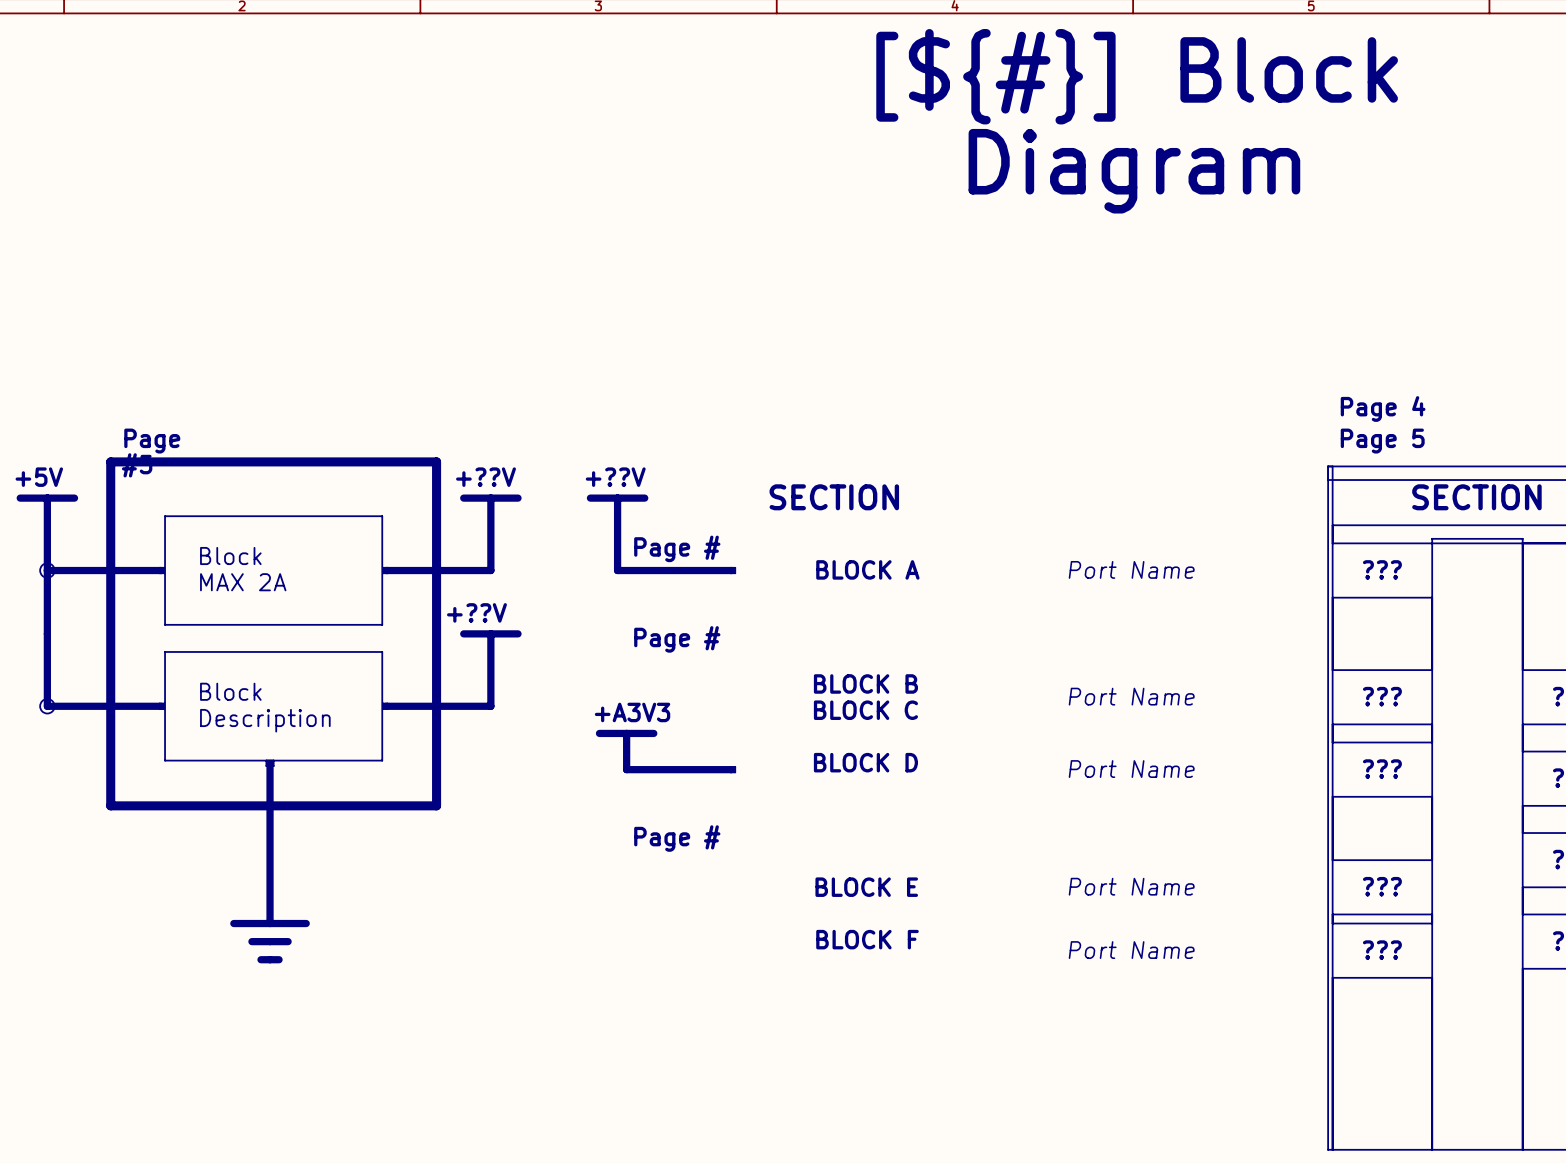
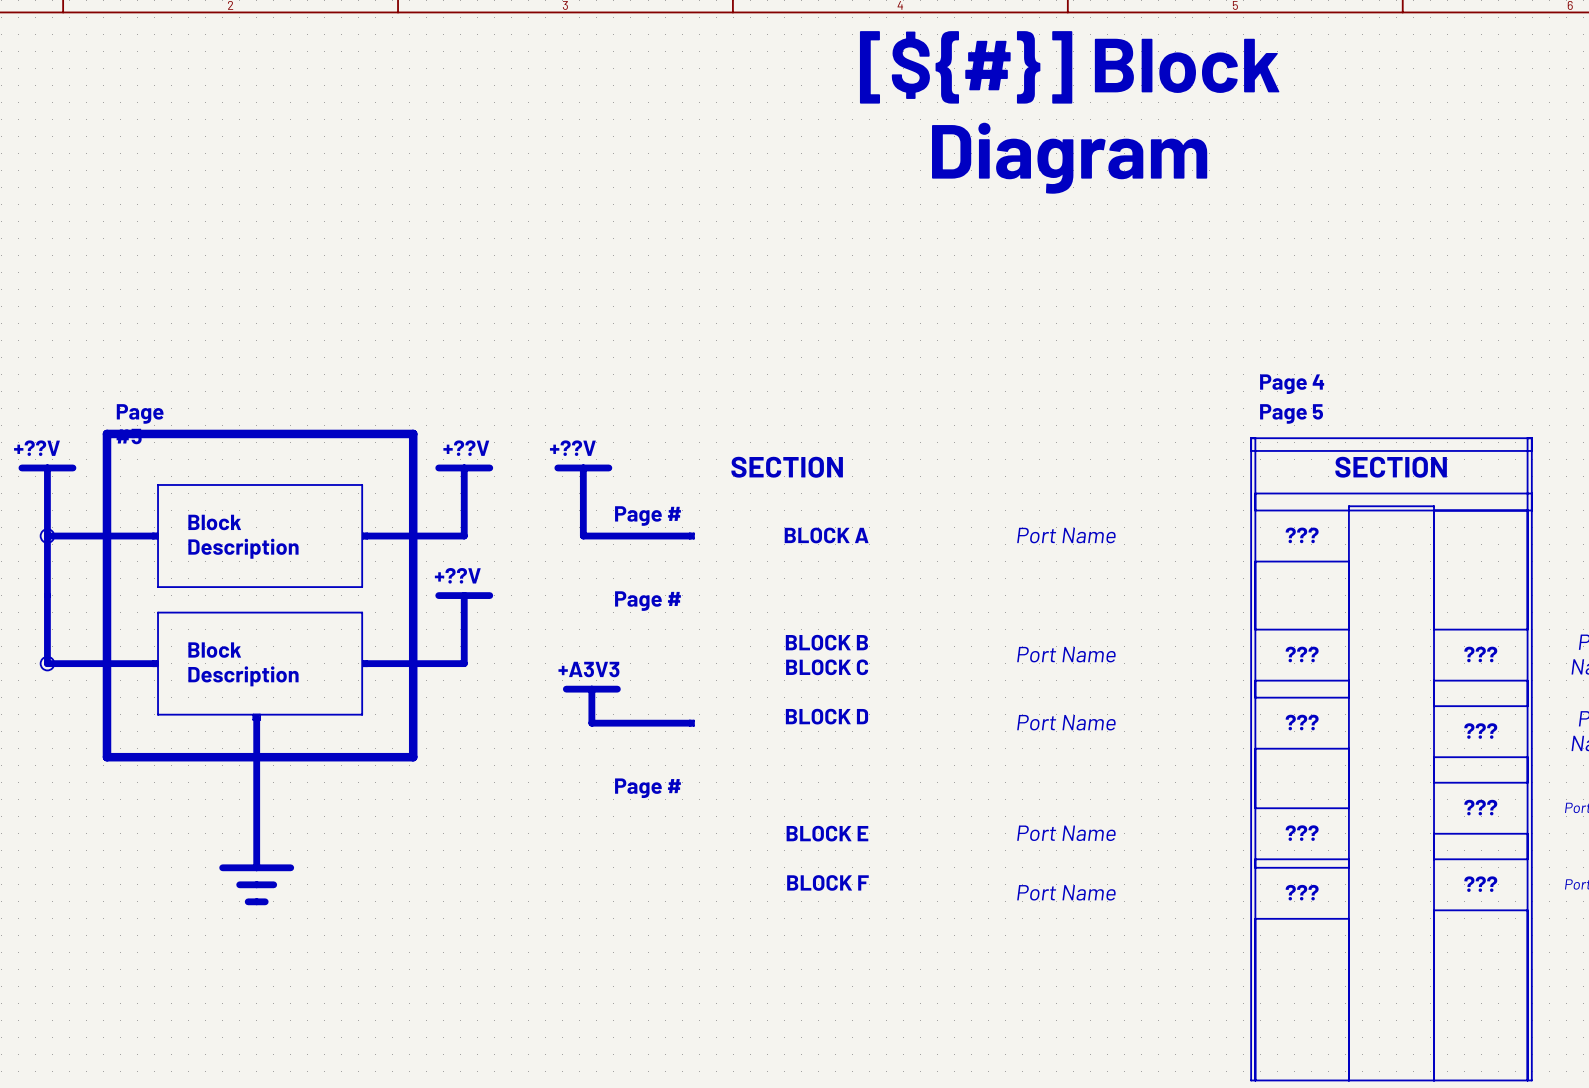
text: +5V (39, 477) -> +??V (36, 448)
text: MAX 2A (243, 582) -> Description (243, 548)

